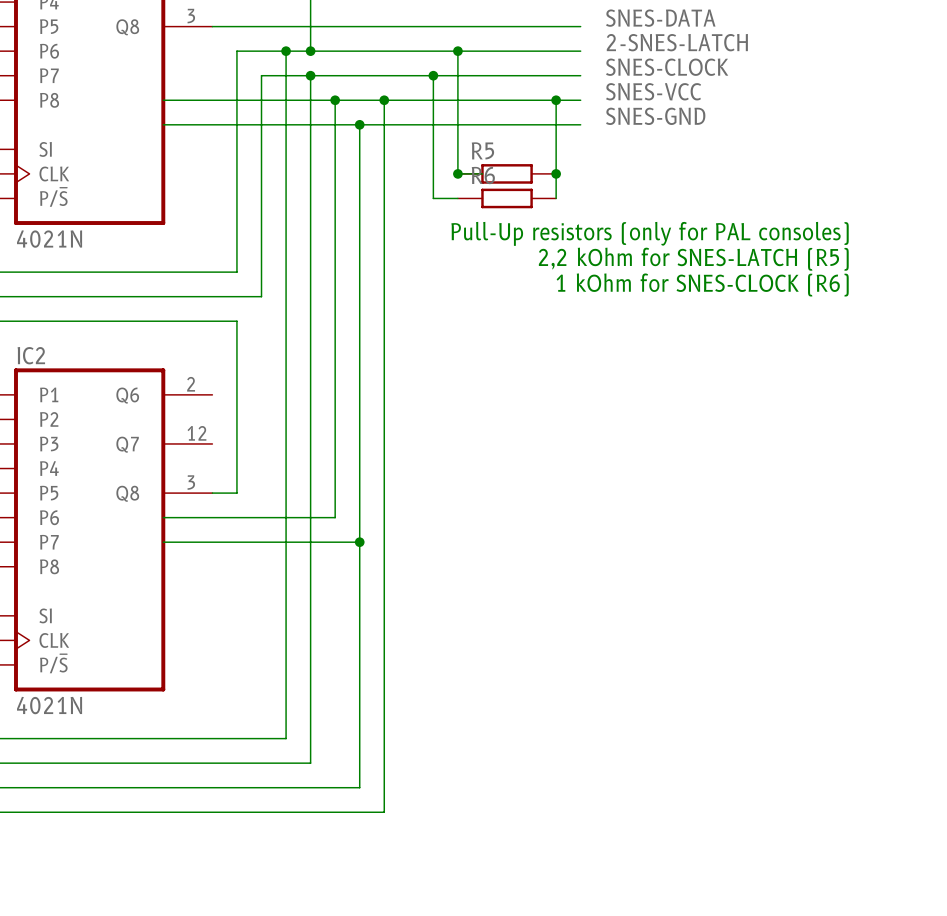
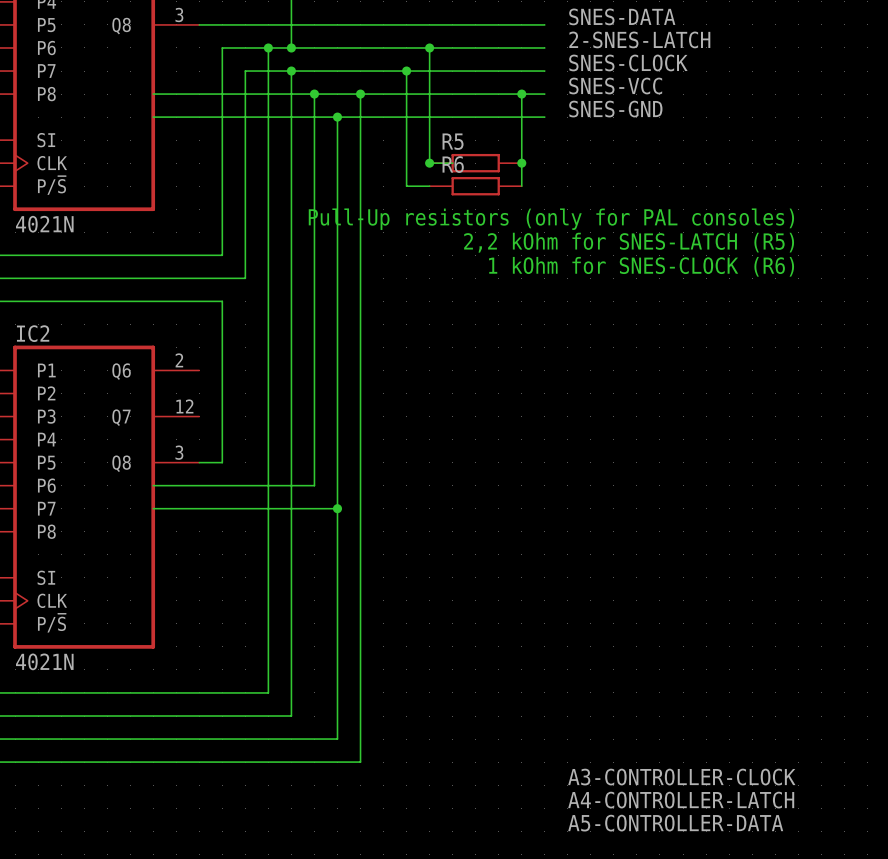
label: none -> A3-CONTROLLER-CLOCK (681, 777)
label: none -> A4-CONTROLLER-LATCH (681, 800)
label: none -> A5-CONTROLLER-DATA (675, 823)

